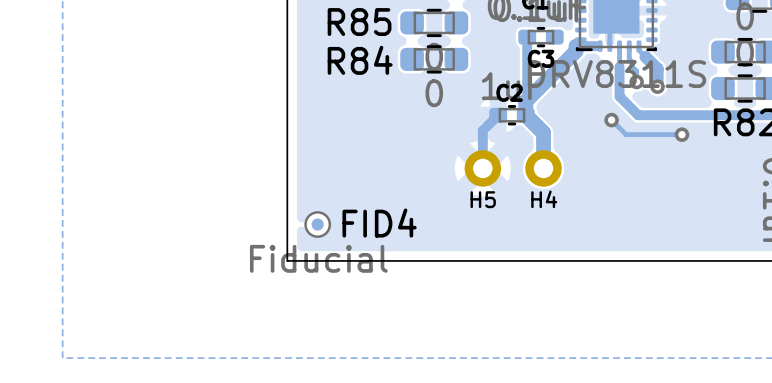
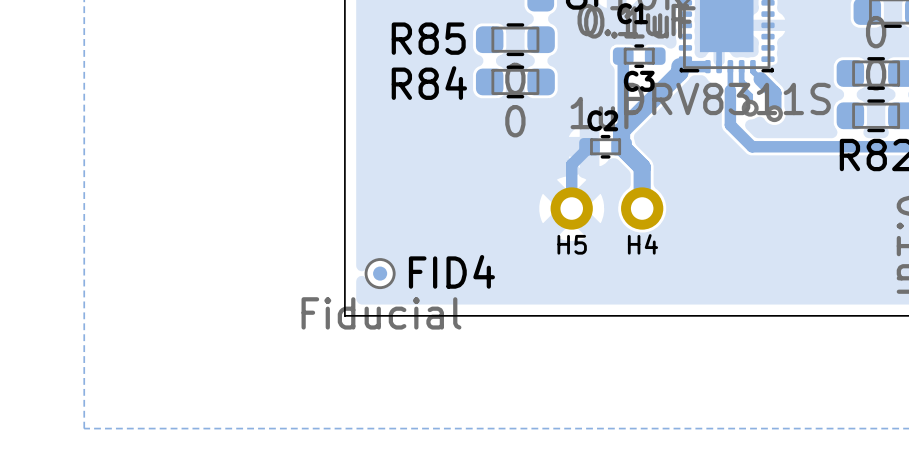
track: (611, 120) (626, 134) (682, 134) -> none
via: (611, 120) -> none
via: (682, 134) -> none

